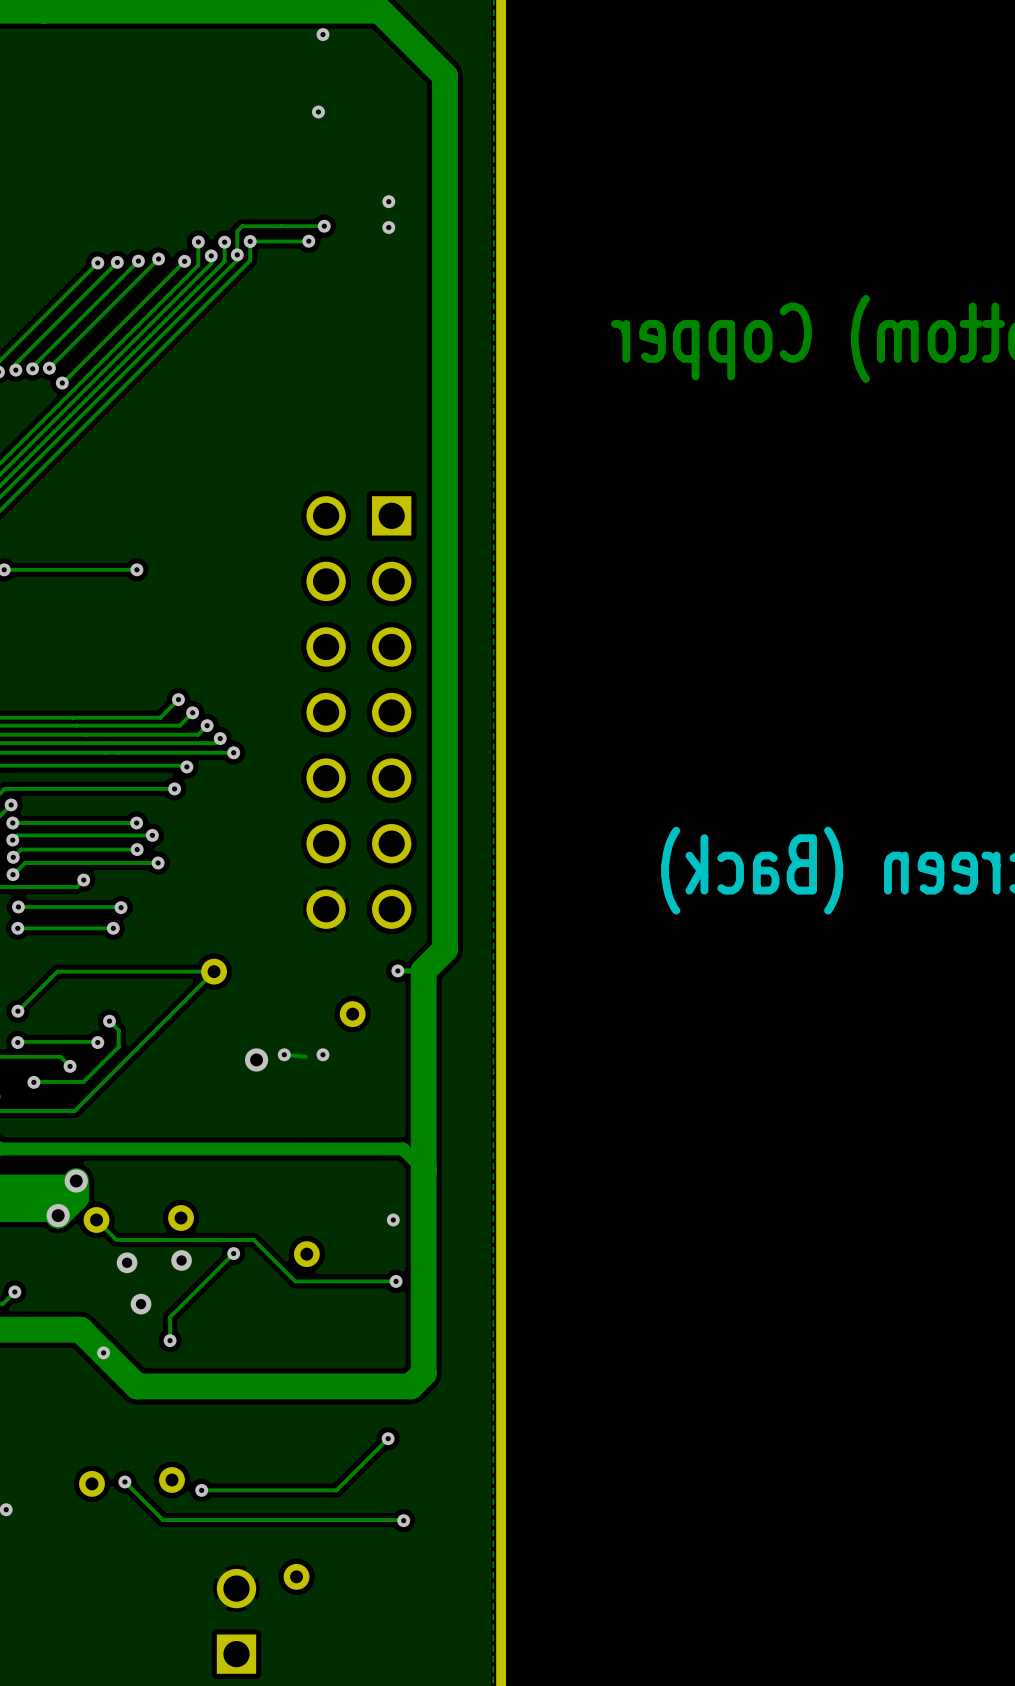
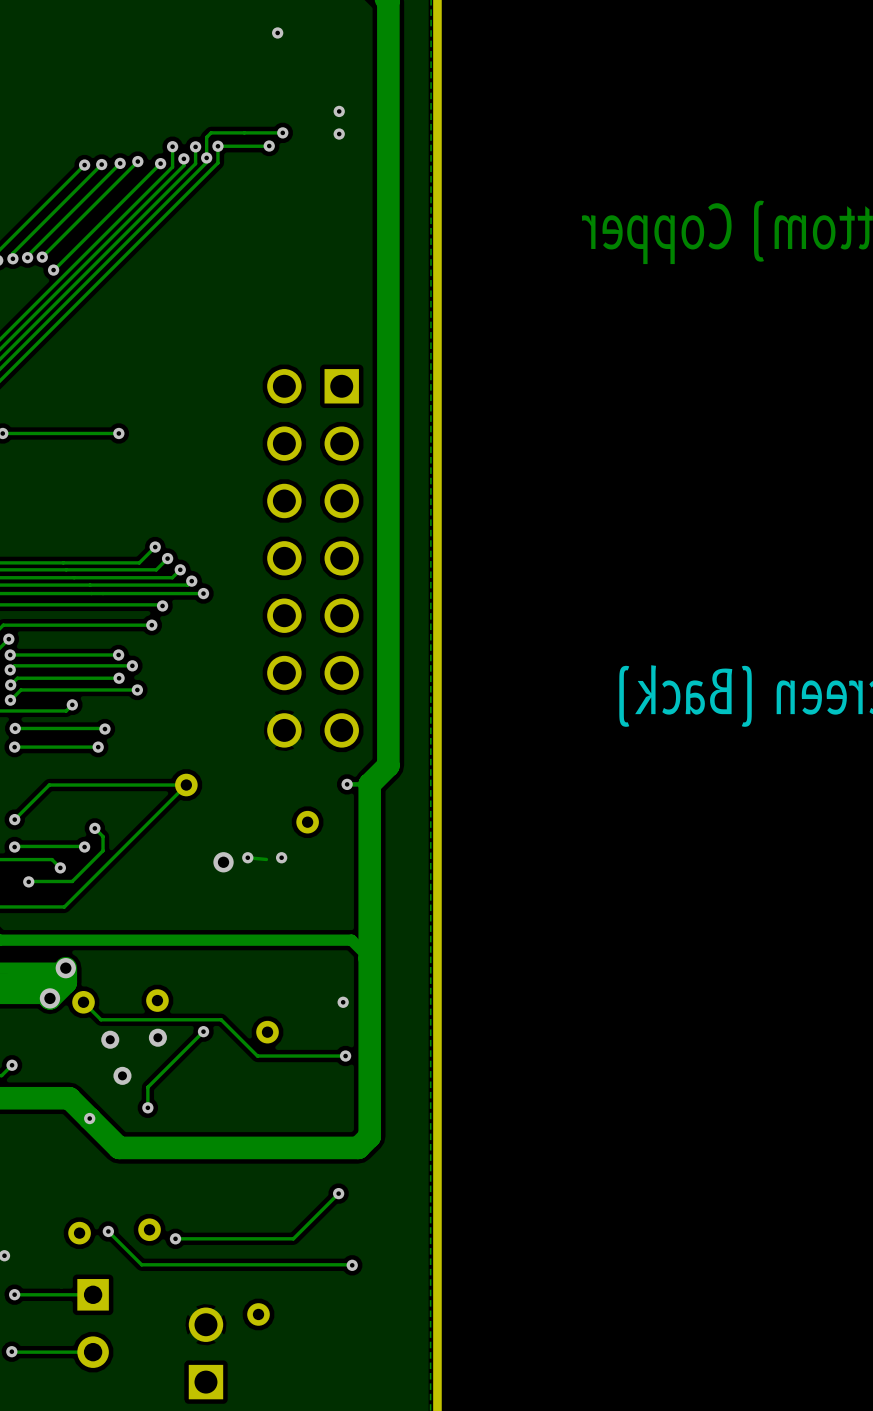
via: none -> (14, 1294)
track: none -> (93, 1294) (14, 1294)
part: none -> (93, 1323)
track: none -> (11, 1351) (93, 1352)
via: none -> (11, 1351)

